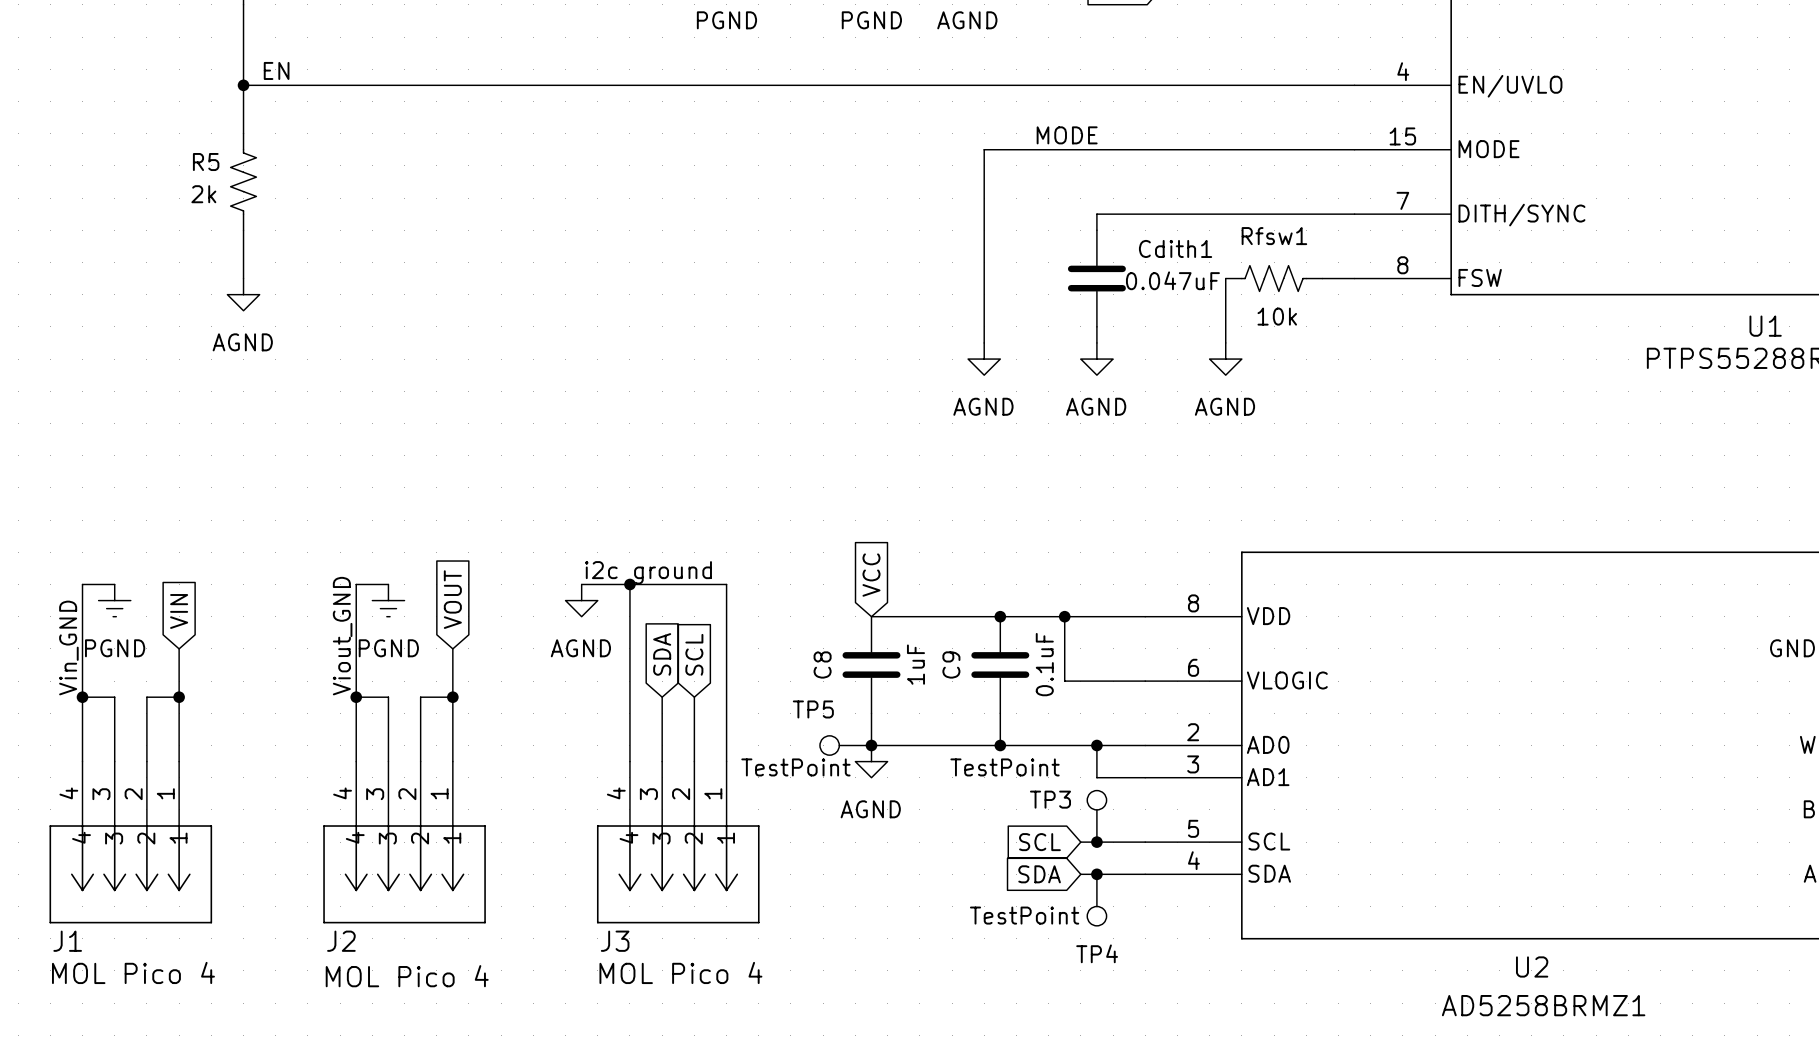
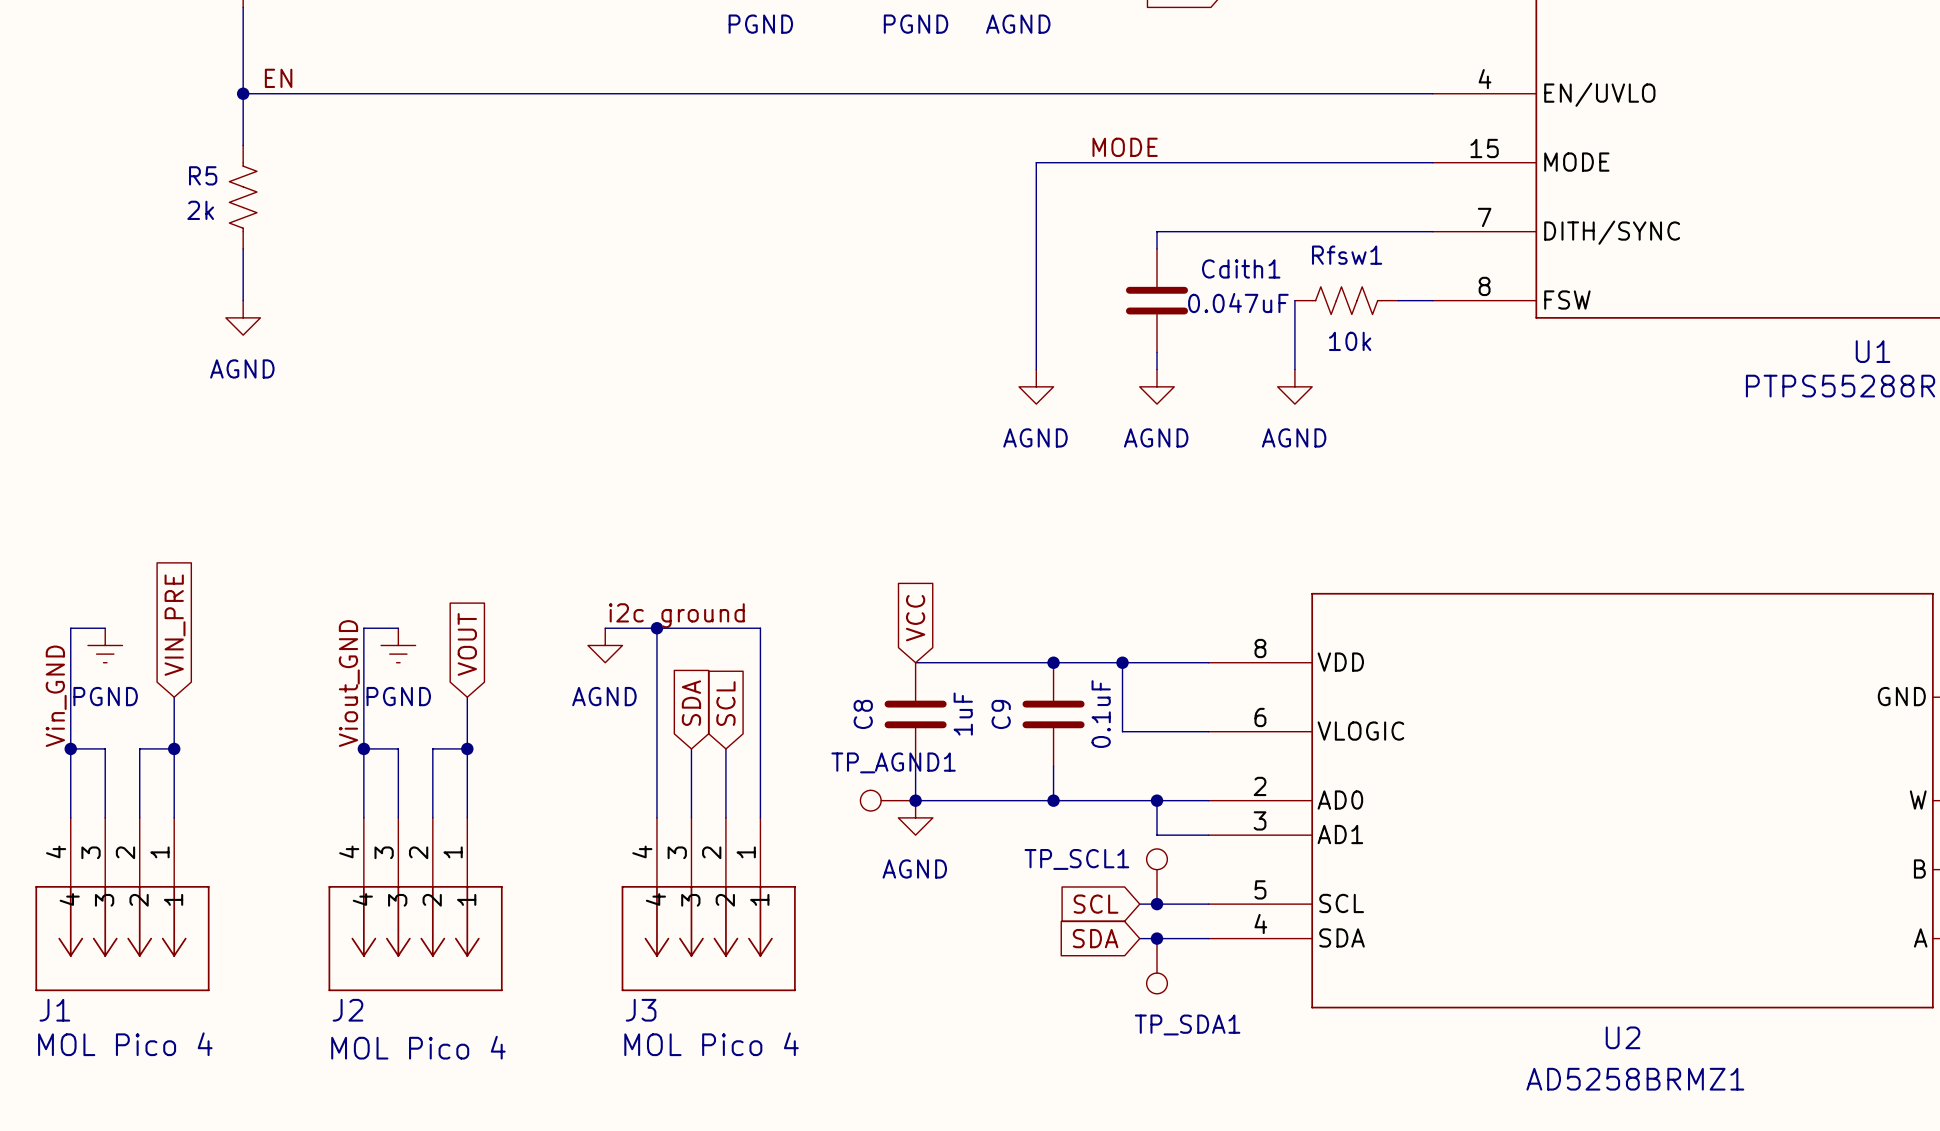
global label: VIN (179, 611) -> VIN_PRE (175, 625)
TP5 name: TP5 (813, 709) -> TP_AGND1 (893, 762)
TP5 value: TestPoint (795, 767) -> none
TP3 value: TestPoint (1005, 767) -> none
TP3 name: TP3 (1050, 799) -> TP_SCL1 (1076, 859)
TP4 value: TestPoint (1024, 915) -> none
TP4 name: TP4 (1097, 953) -> TP_SDA1 (1187, 1024)

